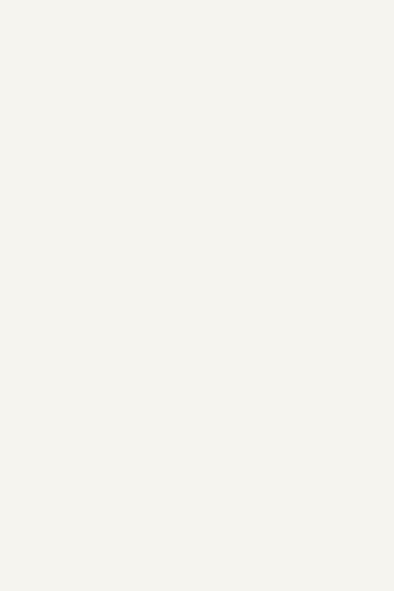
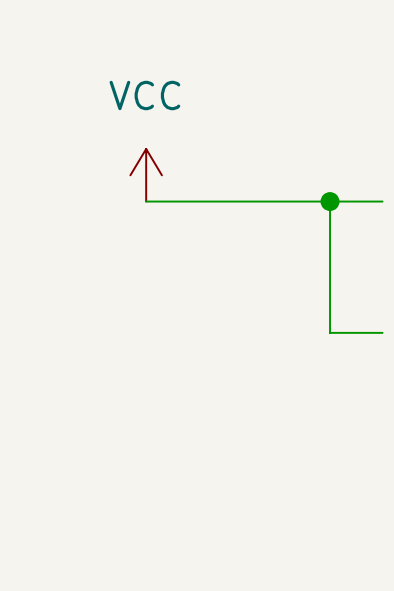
power symbol: none -> VCC (146, 175)
wire: none -> (146, 201) (382, 201)
wire: none -> (330, 201) (330, 332) (382, 332)
junction: none -> (330, 201)

